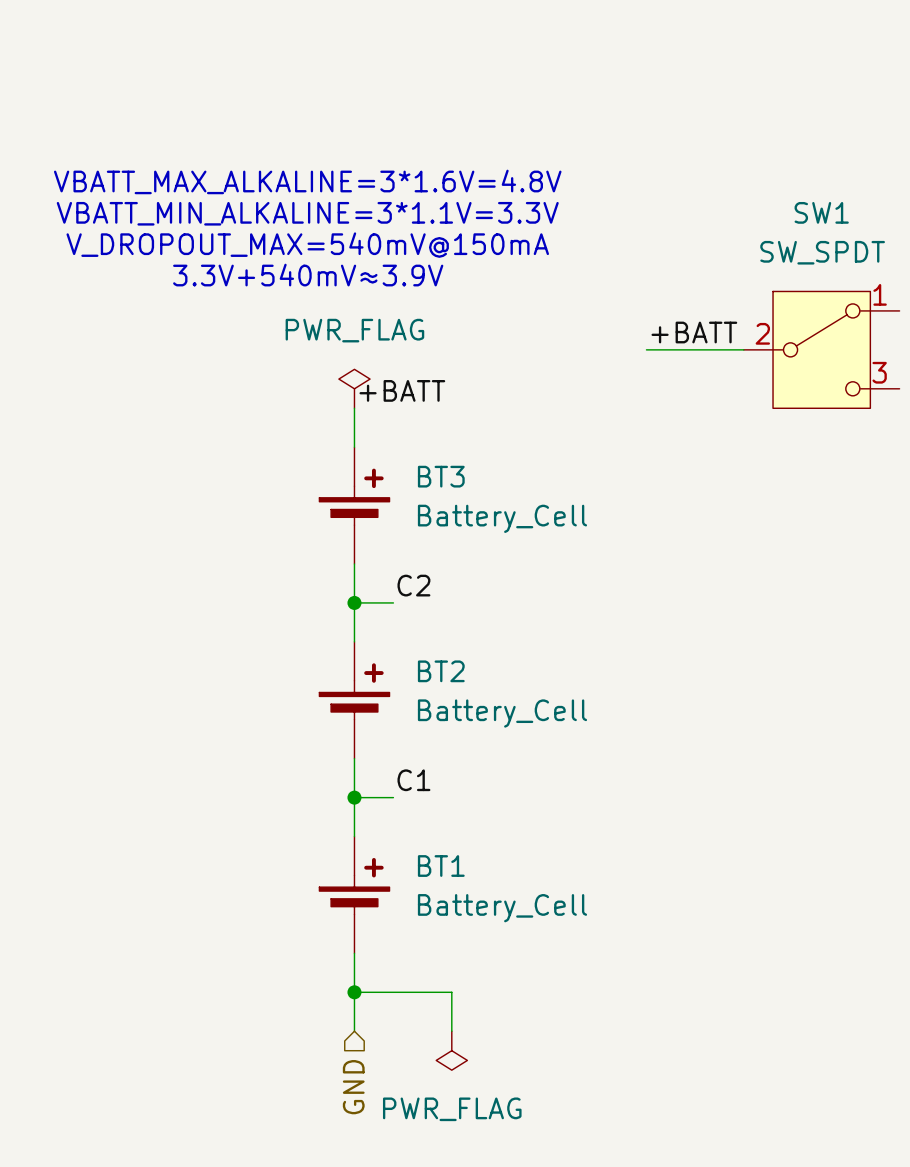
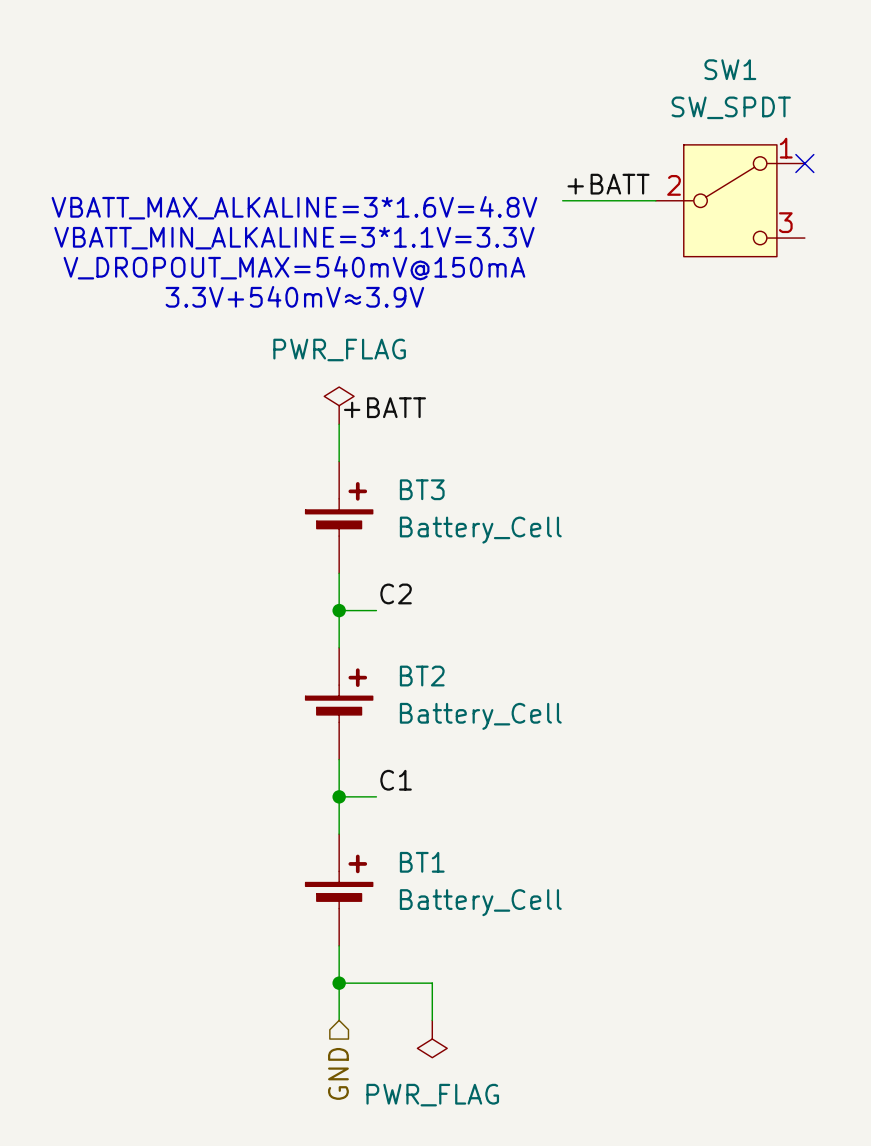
no-connect mark: none -> (804, 163)
label position: +BATT (694, 332) -> +BATT (608, 184)
wire: (646, 349) (743, 349) -> (562, 200) (655, 200)
SW1 position: (821, 349) -> (730, 200)

